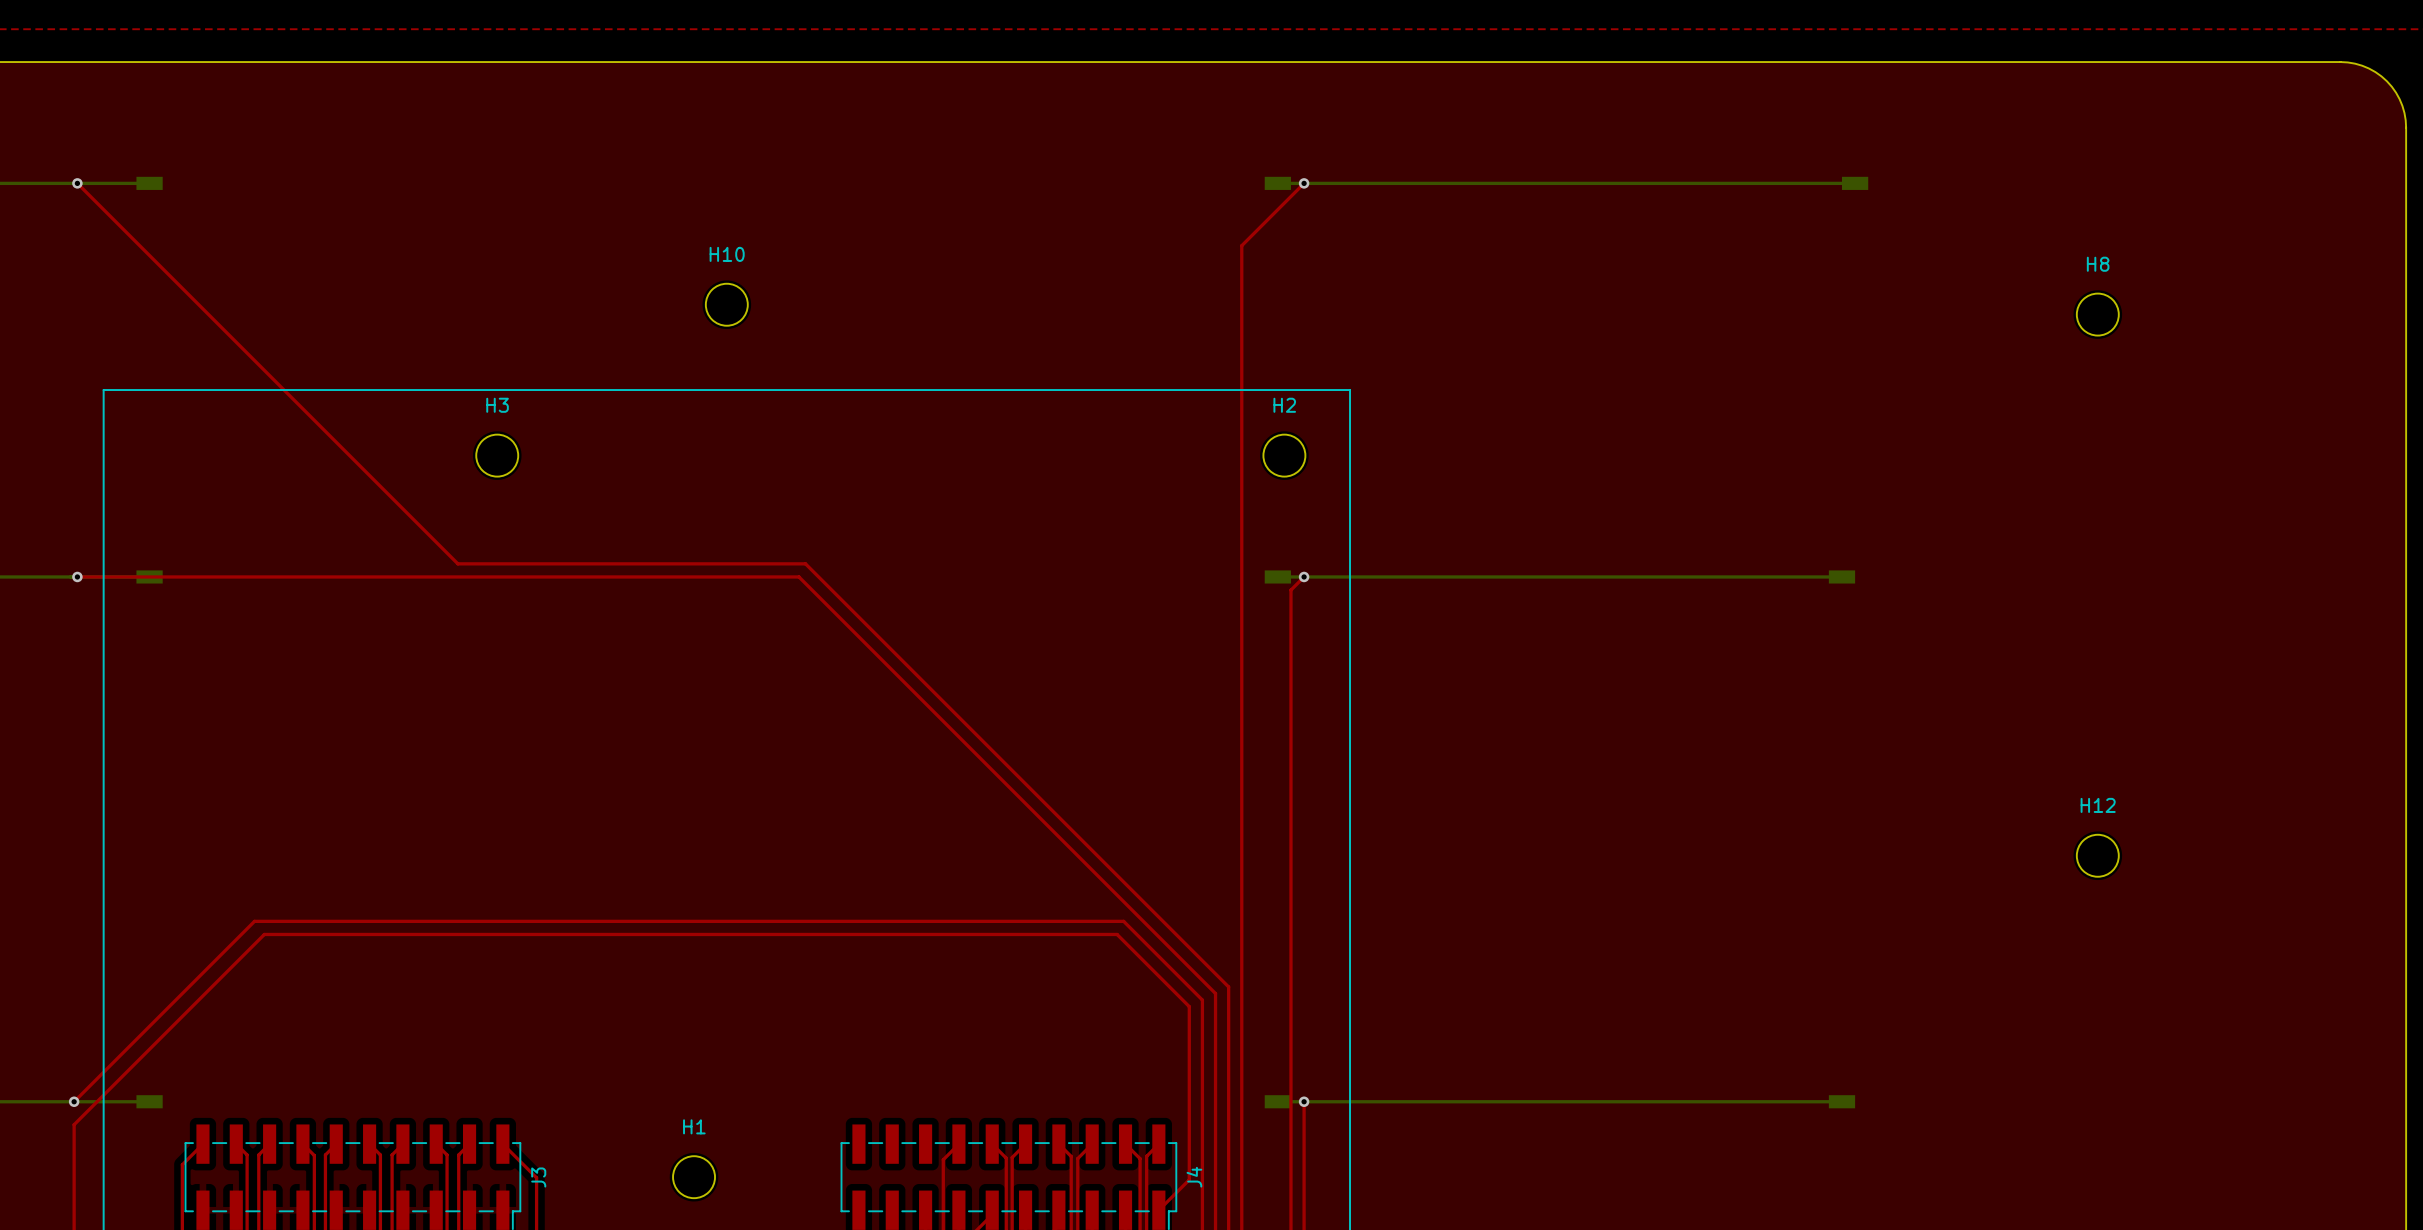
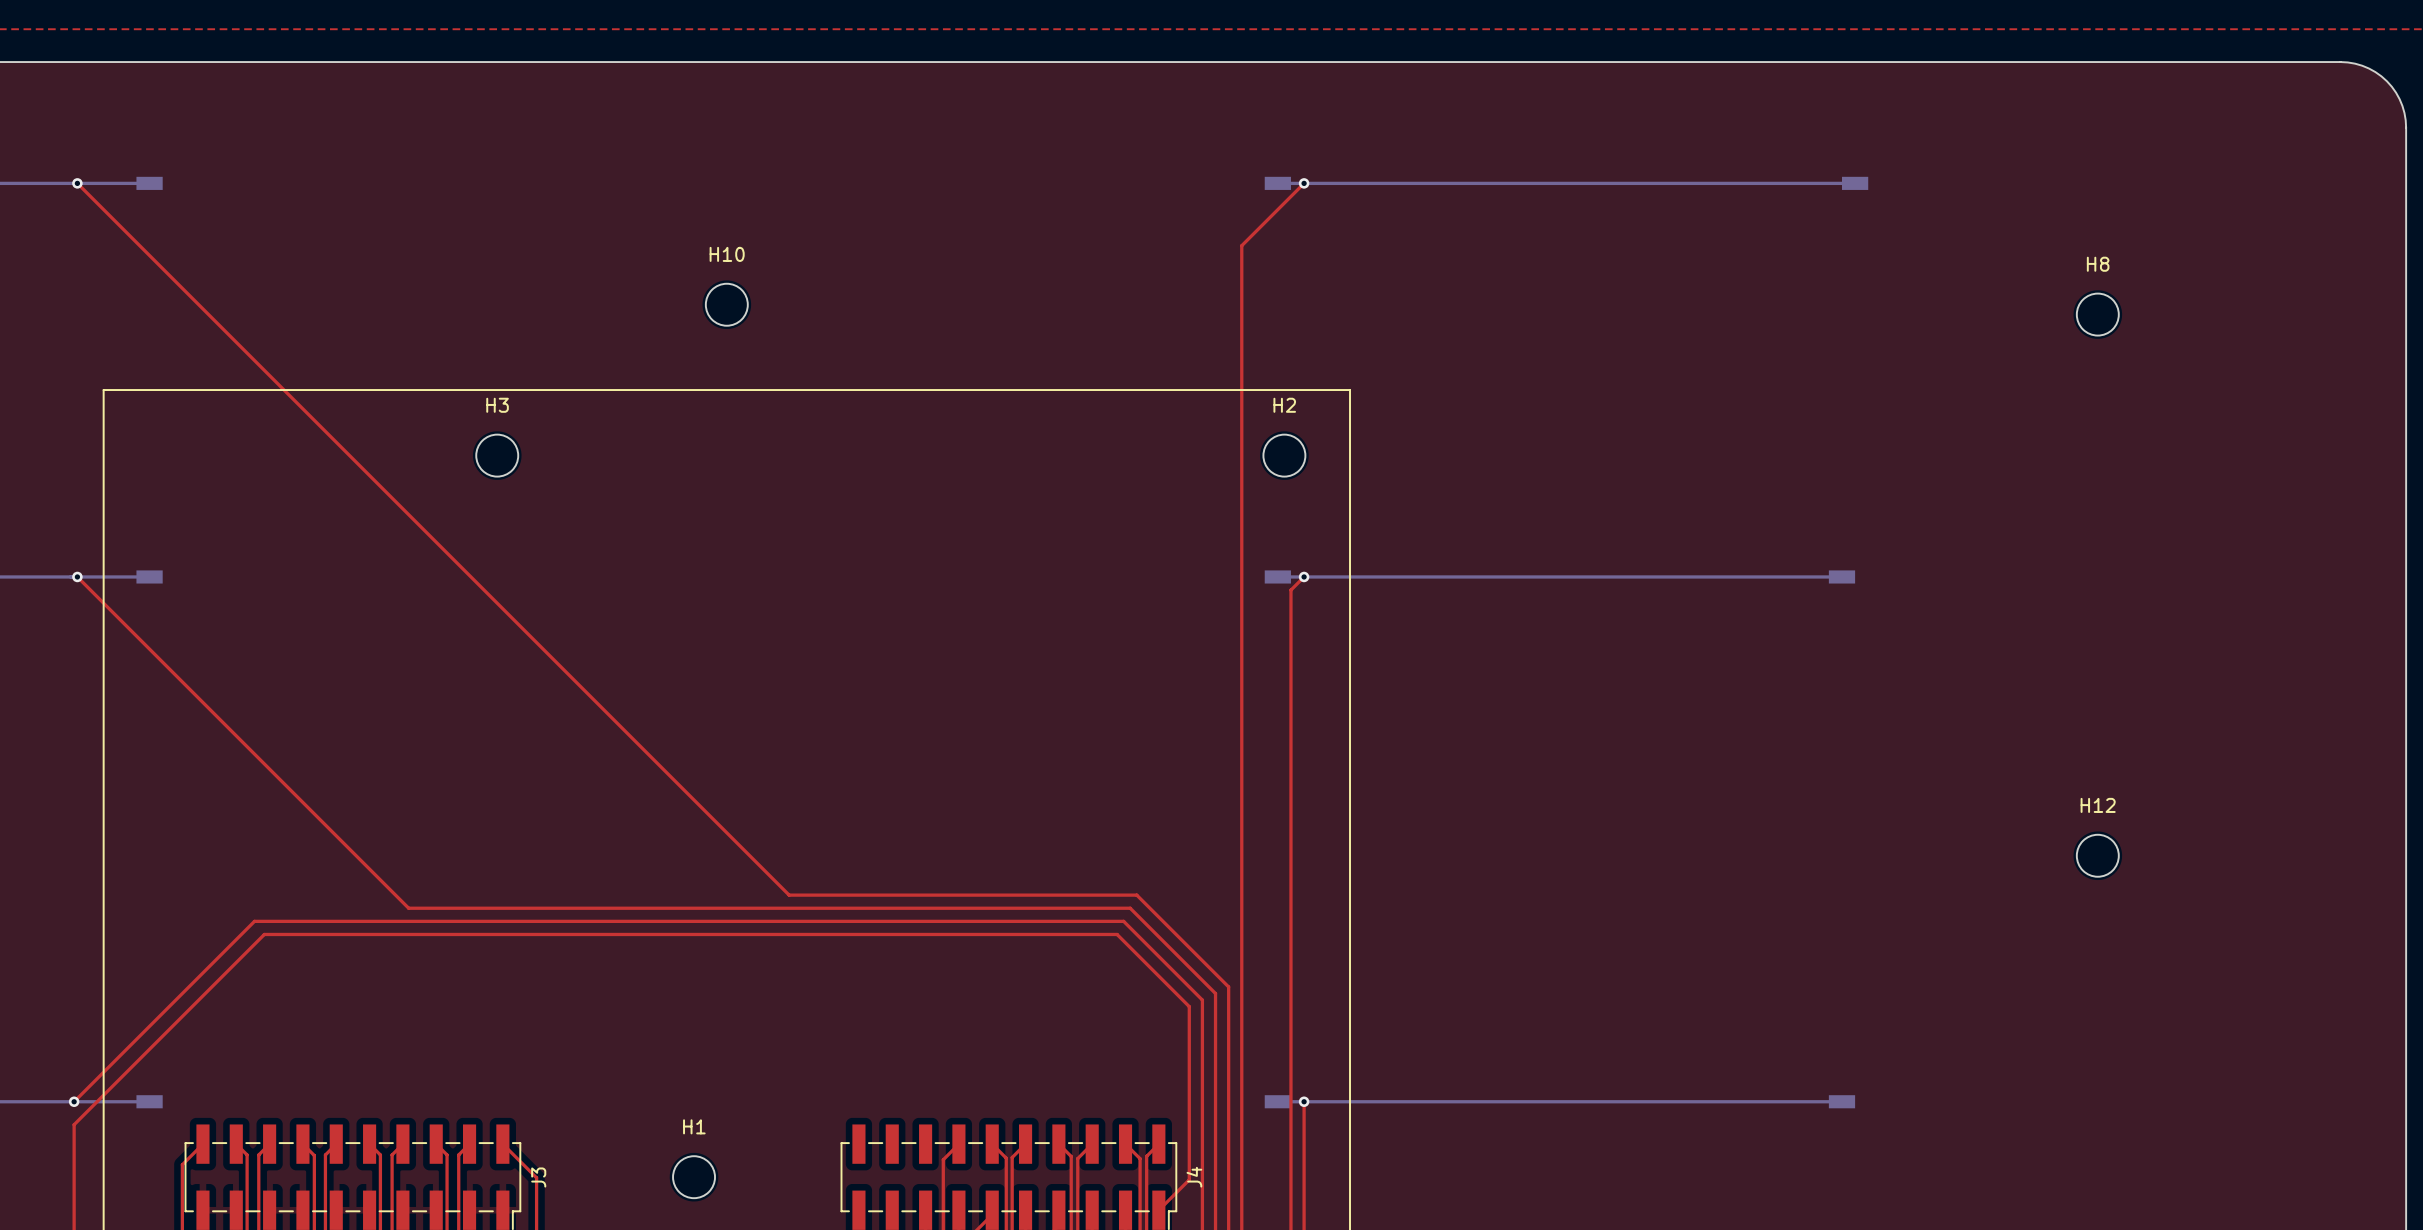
top track: (457, 563) (805, 563) (1136, 895) -> (457, 563) (789, 895) (1136, 895)
top track: (77, 576) (798, 576) (1130, 908) -> (77, 576) (408, 908) (1130, 908)

